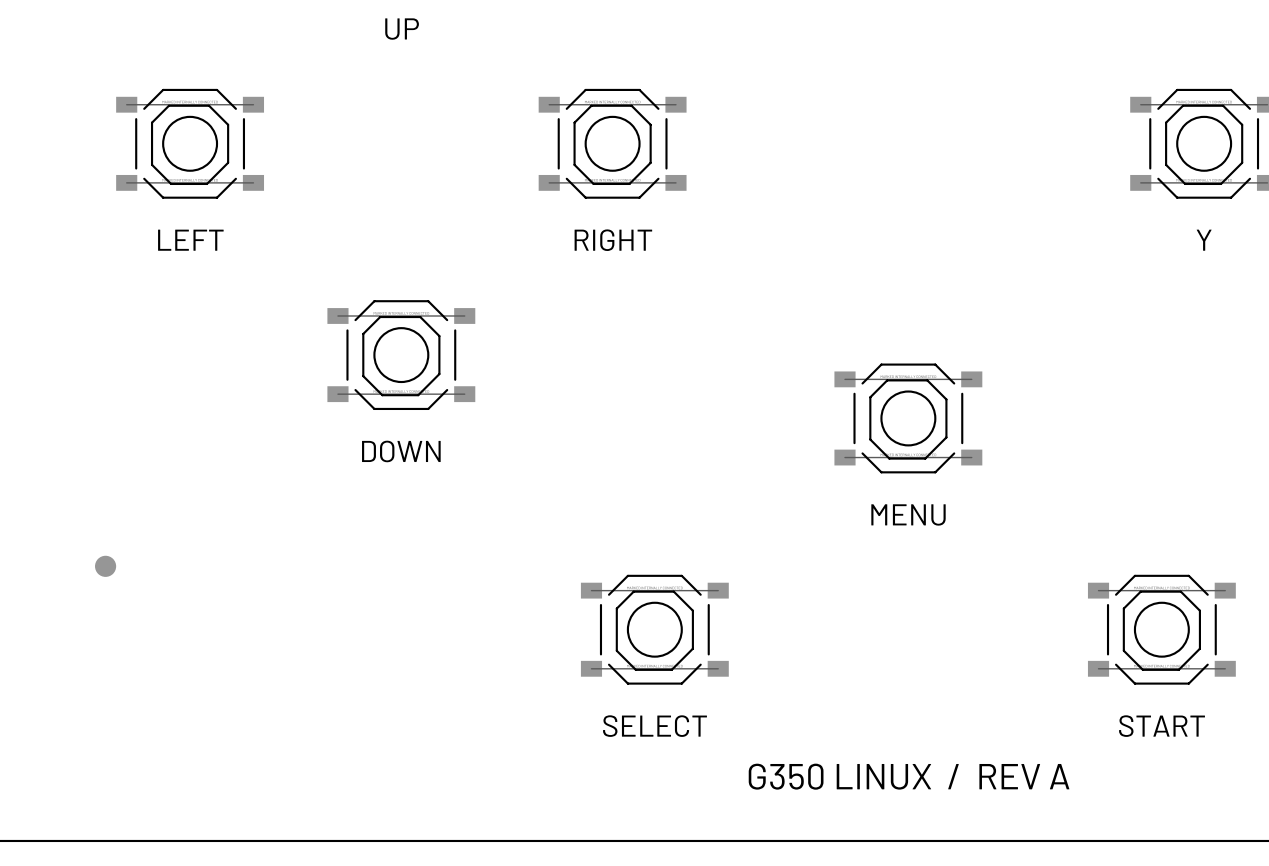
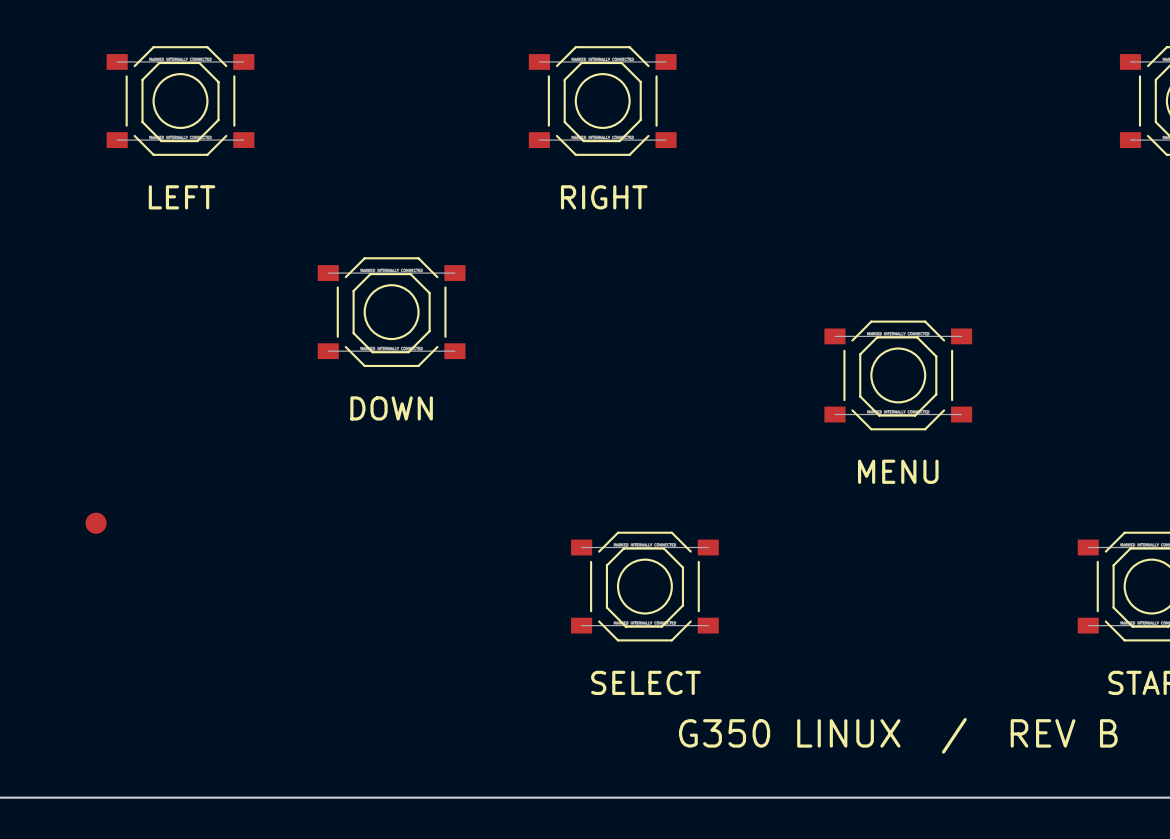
text: G350 LINUX / REV A (909, 776) -> G350 LINUX / REV B (898, 735)

